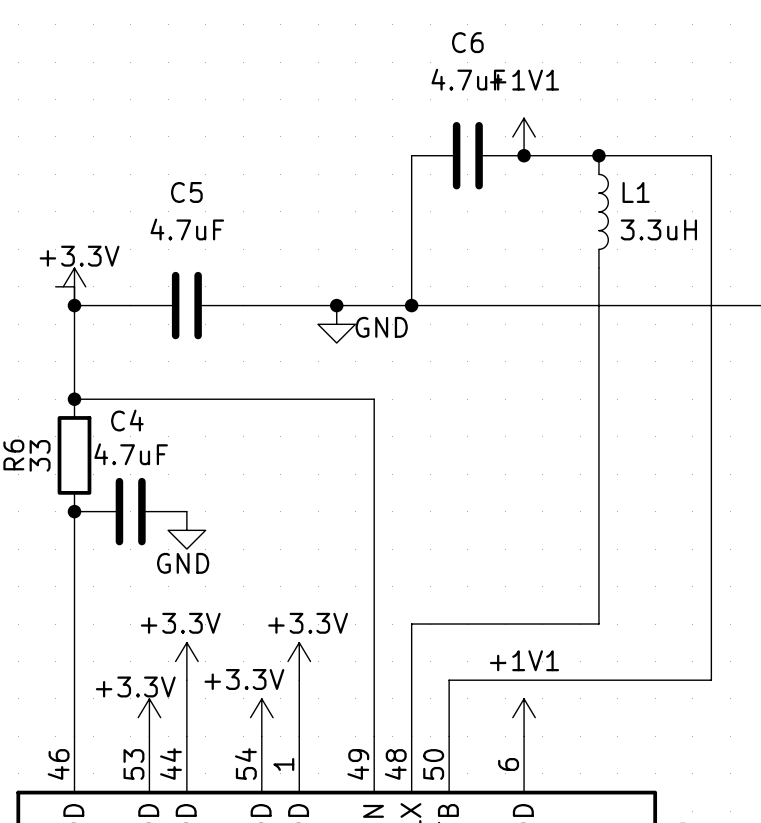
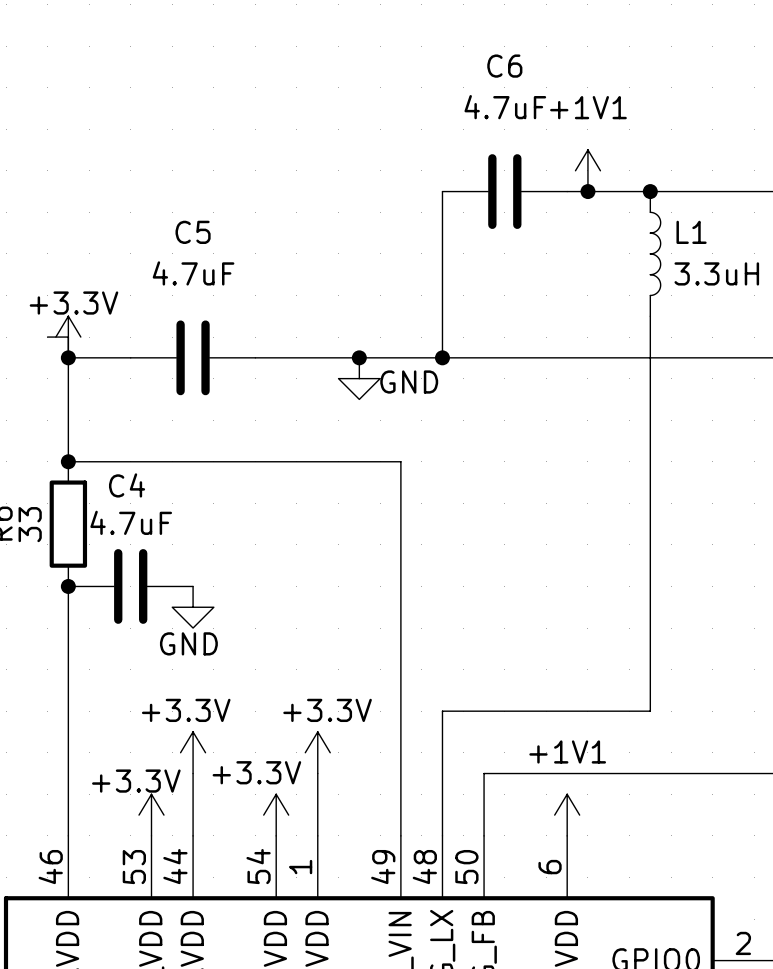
power symbol position: +1V1 (524, 136) -> +1V1 (587, 170)
junction position: (524, 155) -> (587, 191)

